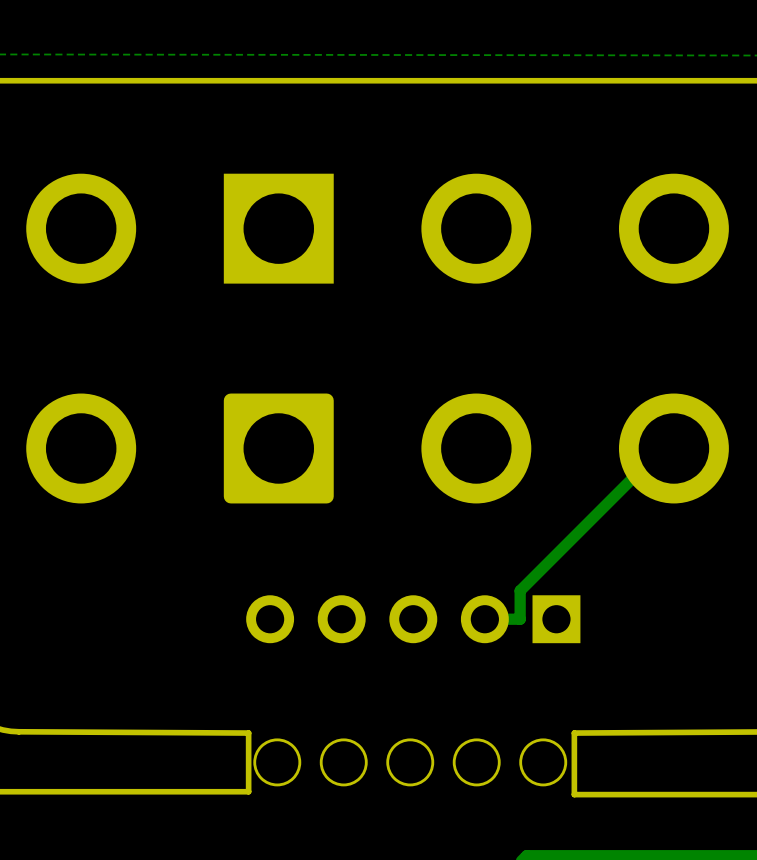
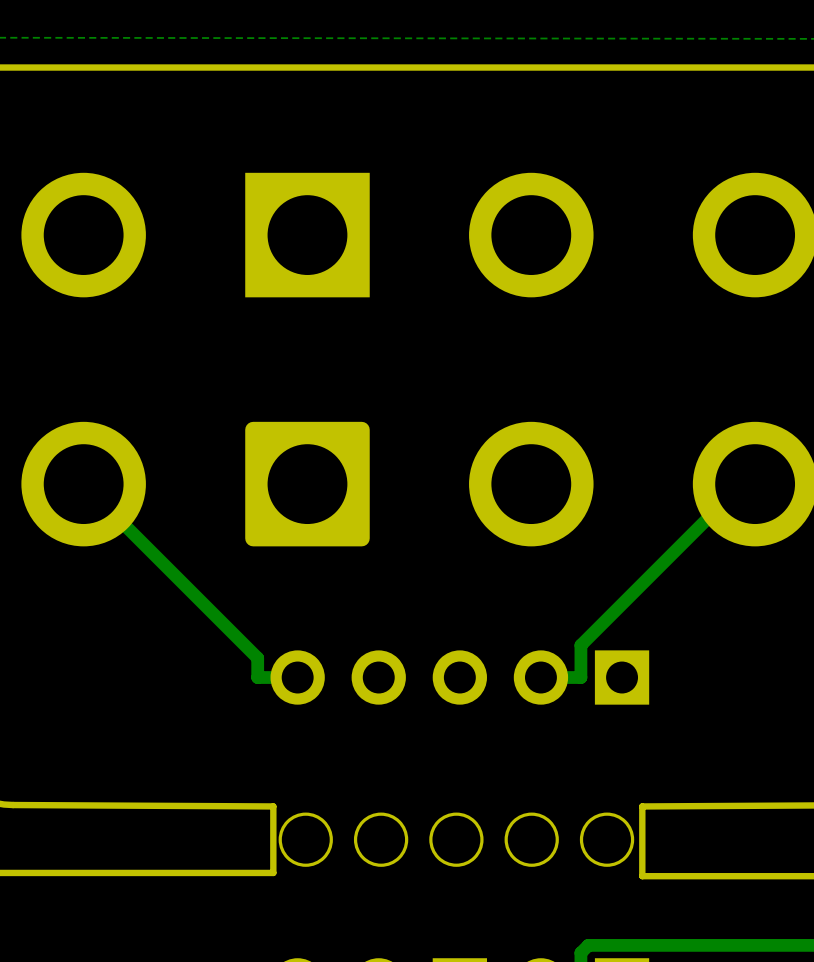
track: none -> (83, 484) (257, 658) (257, 677) (297, 677)

